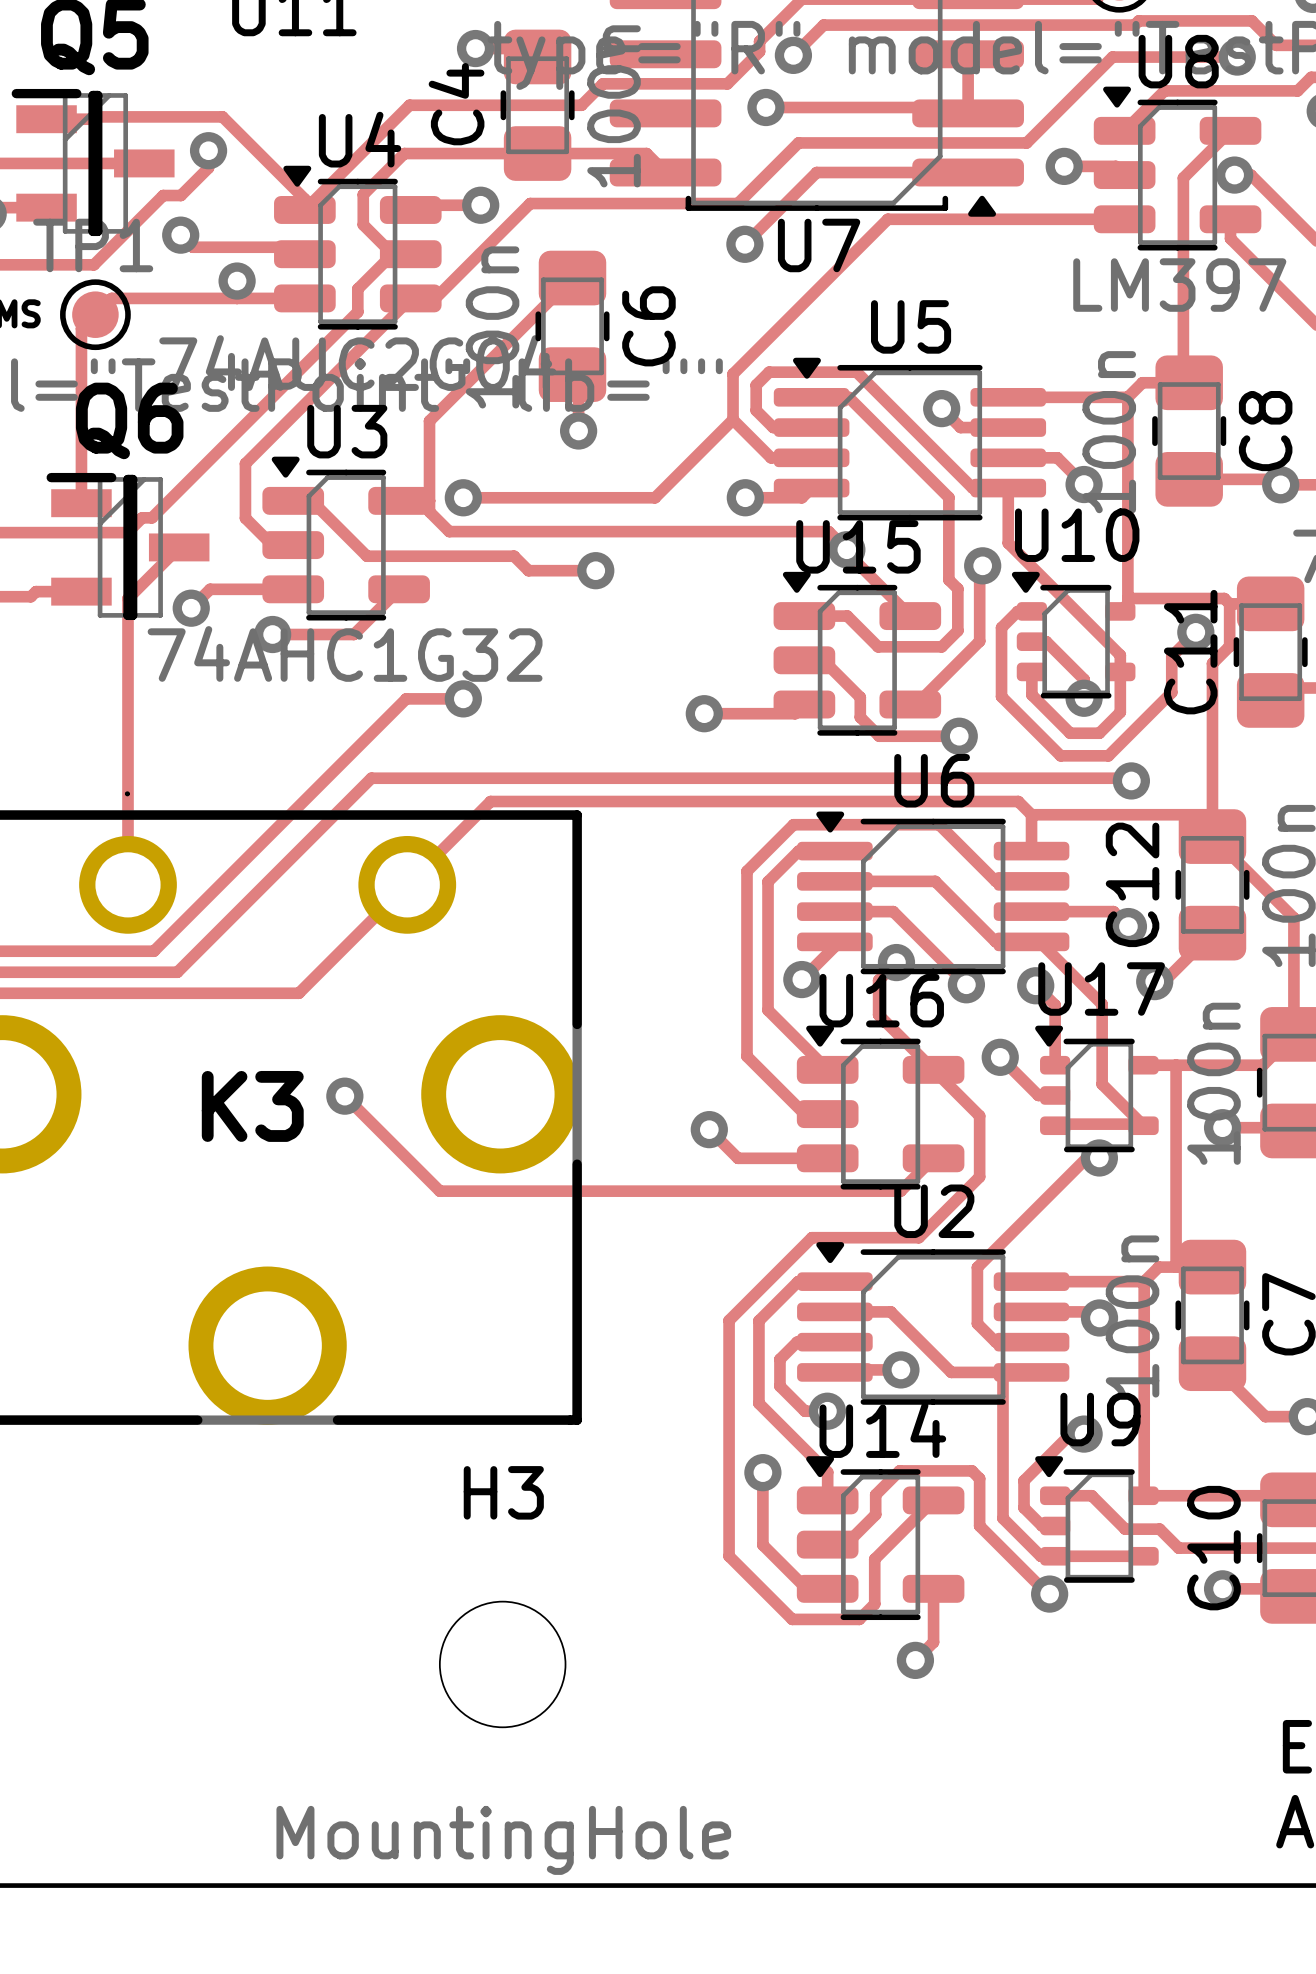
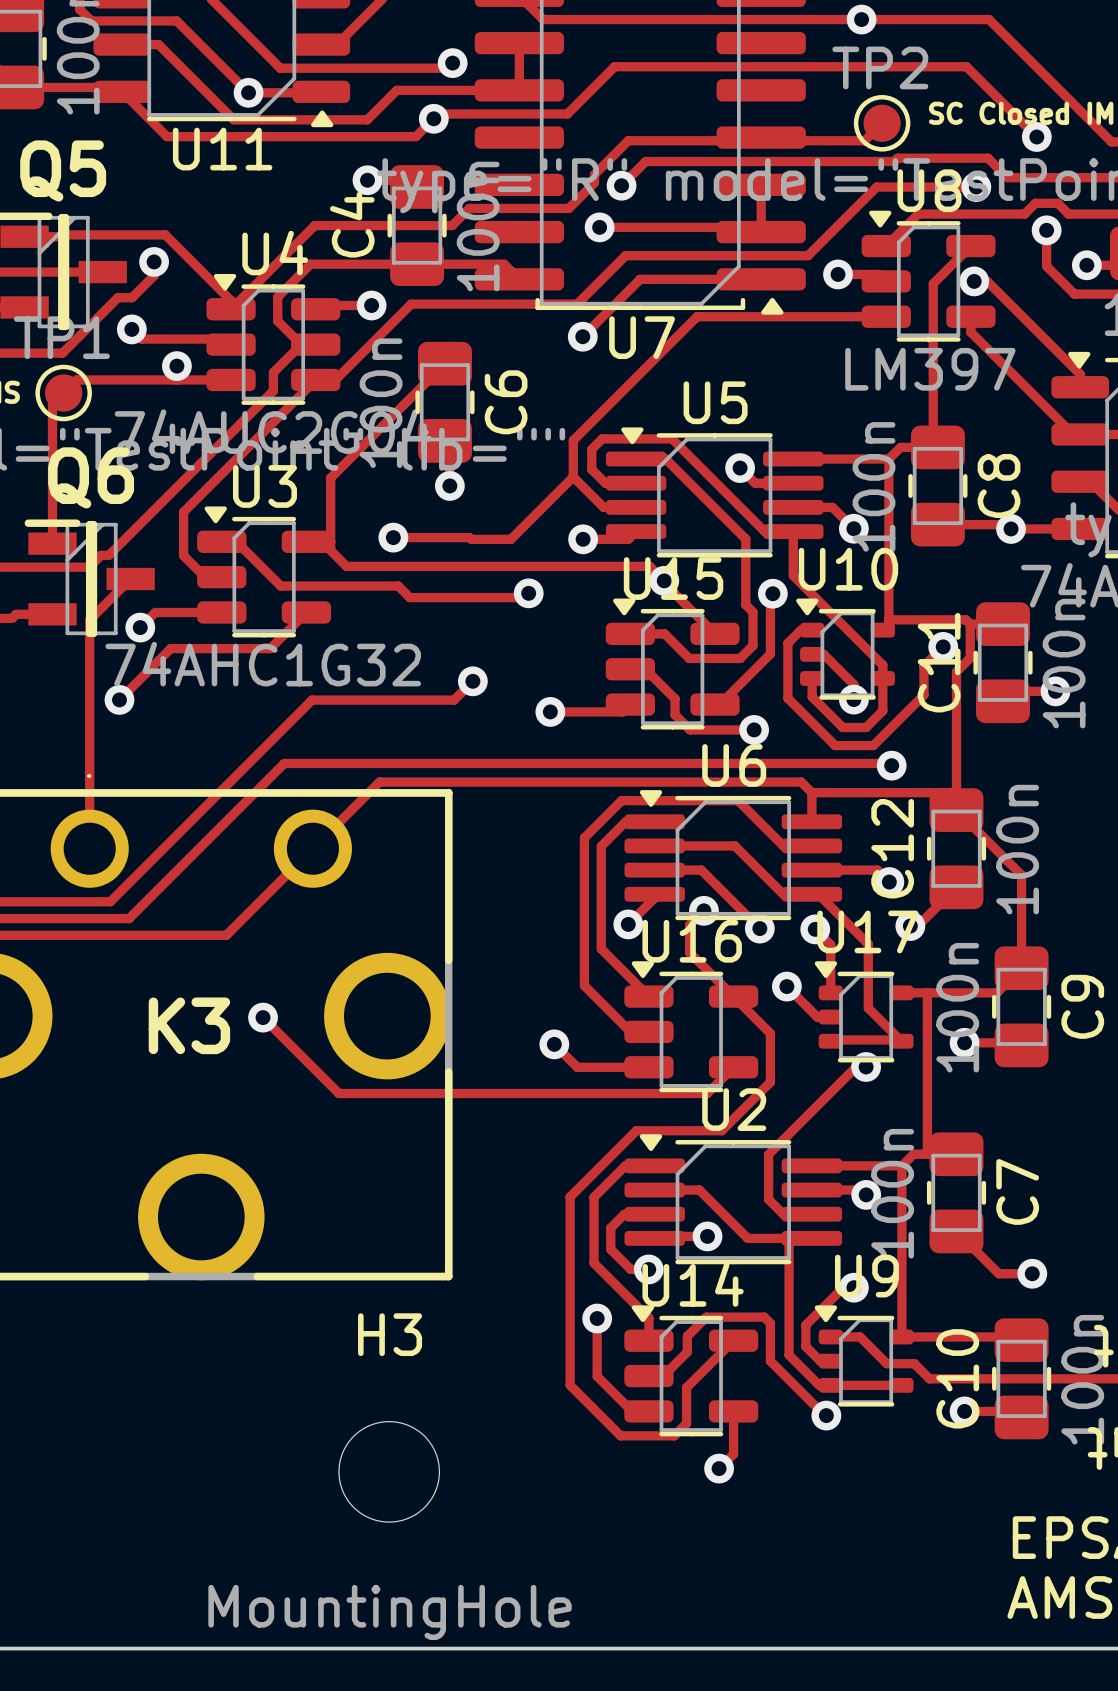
track: (463, 497) (605, 497) -> (393, 537) (469, 537) (471, 539)
via position: (463, 497) -> (393, 537)
track: none -> (528, 593) (524, 597) (463, 597)
via: none -> (528, 593)
via: (595, 570) -> none
track: none -> (205, 648) (170, 648) (119, 699)
via position: (272, 634) -> (119, 699)
track: none -> (472, 681) (454, 700) (357, 700)
via: none -> (472, 681)
via: (463, 698) -> none

